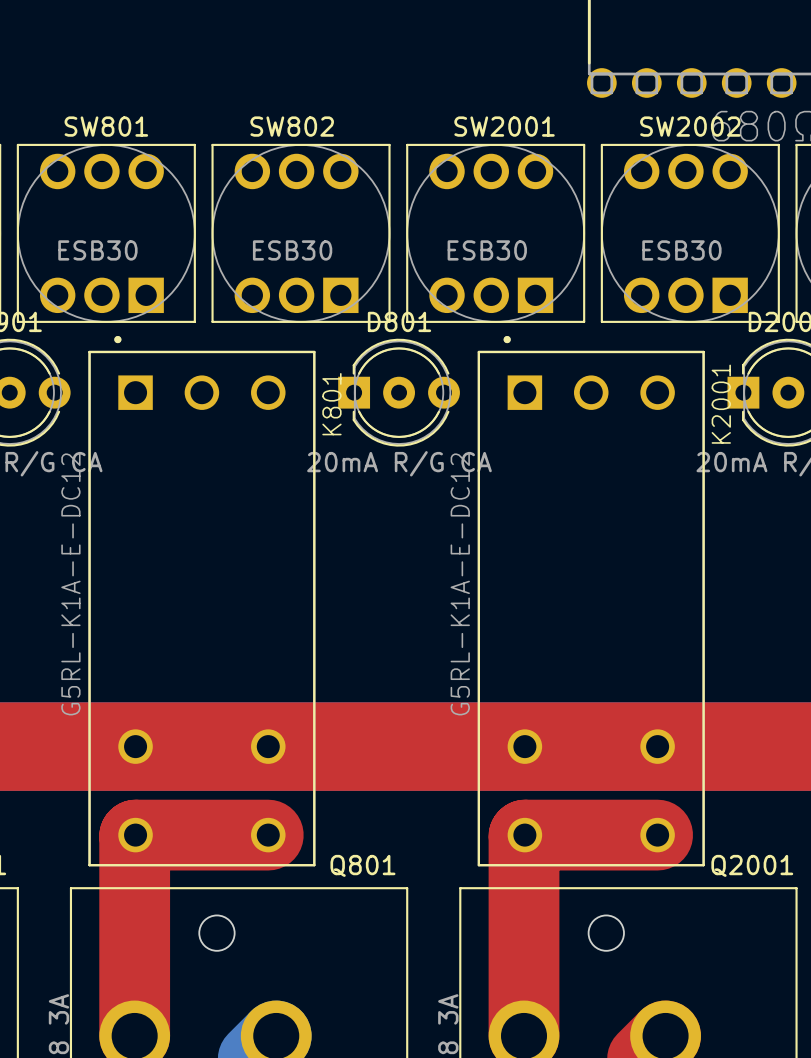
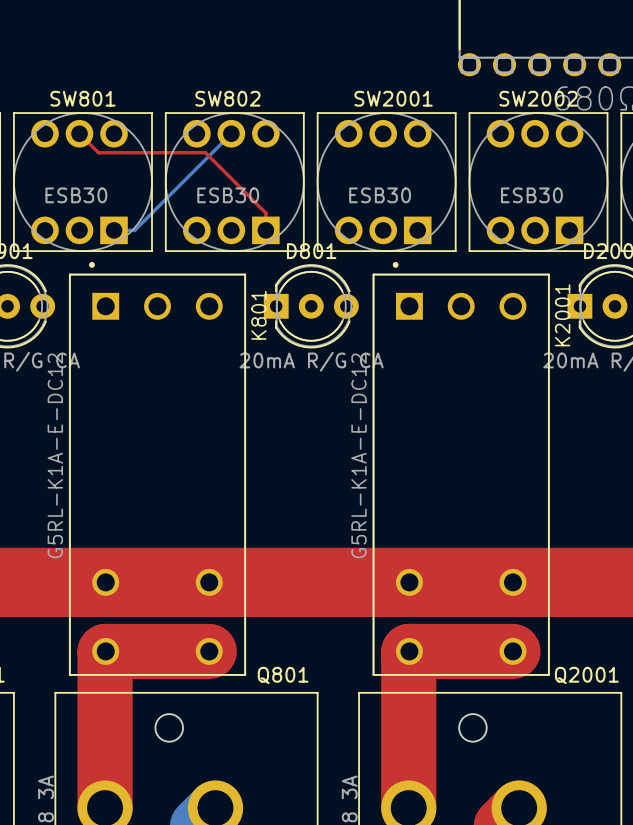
top track: none -> (79, 133) (98, 152) (205, 152) (265, 213) (265, 230)
bottom track: none -> (231, 133) (134, 230) (114, 230)

